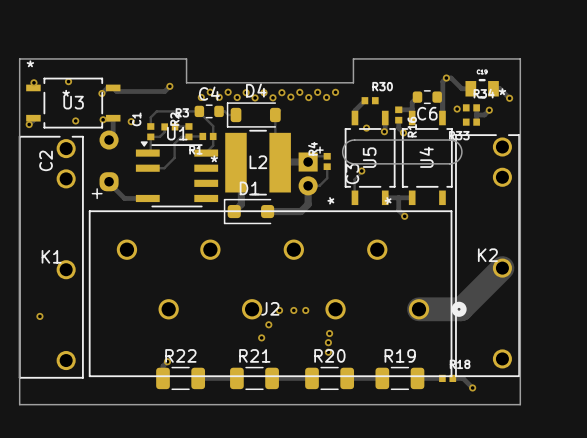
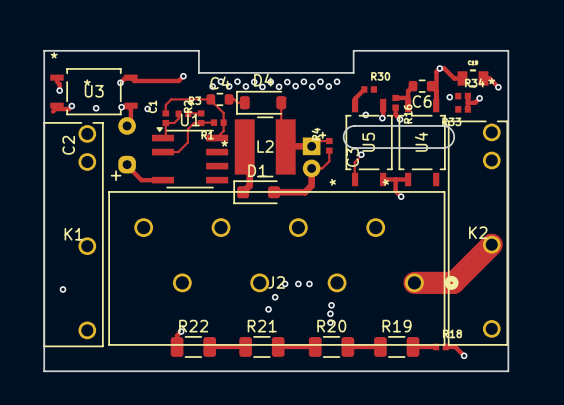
via: (68, 81) -> none
via: (33, 82) -> none
track: none -> (56, 81) (59, 84) (59, 90)
via: none -> (59, 90)
track: none -> (71, 106) (68, 109) (56, 109)
via: none -> (71, 106)
via: (29, 124) -> none

